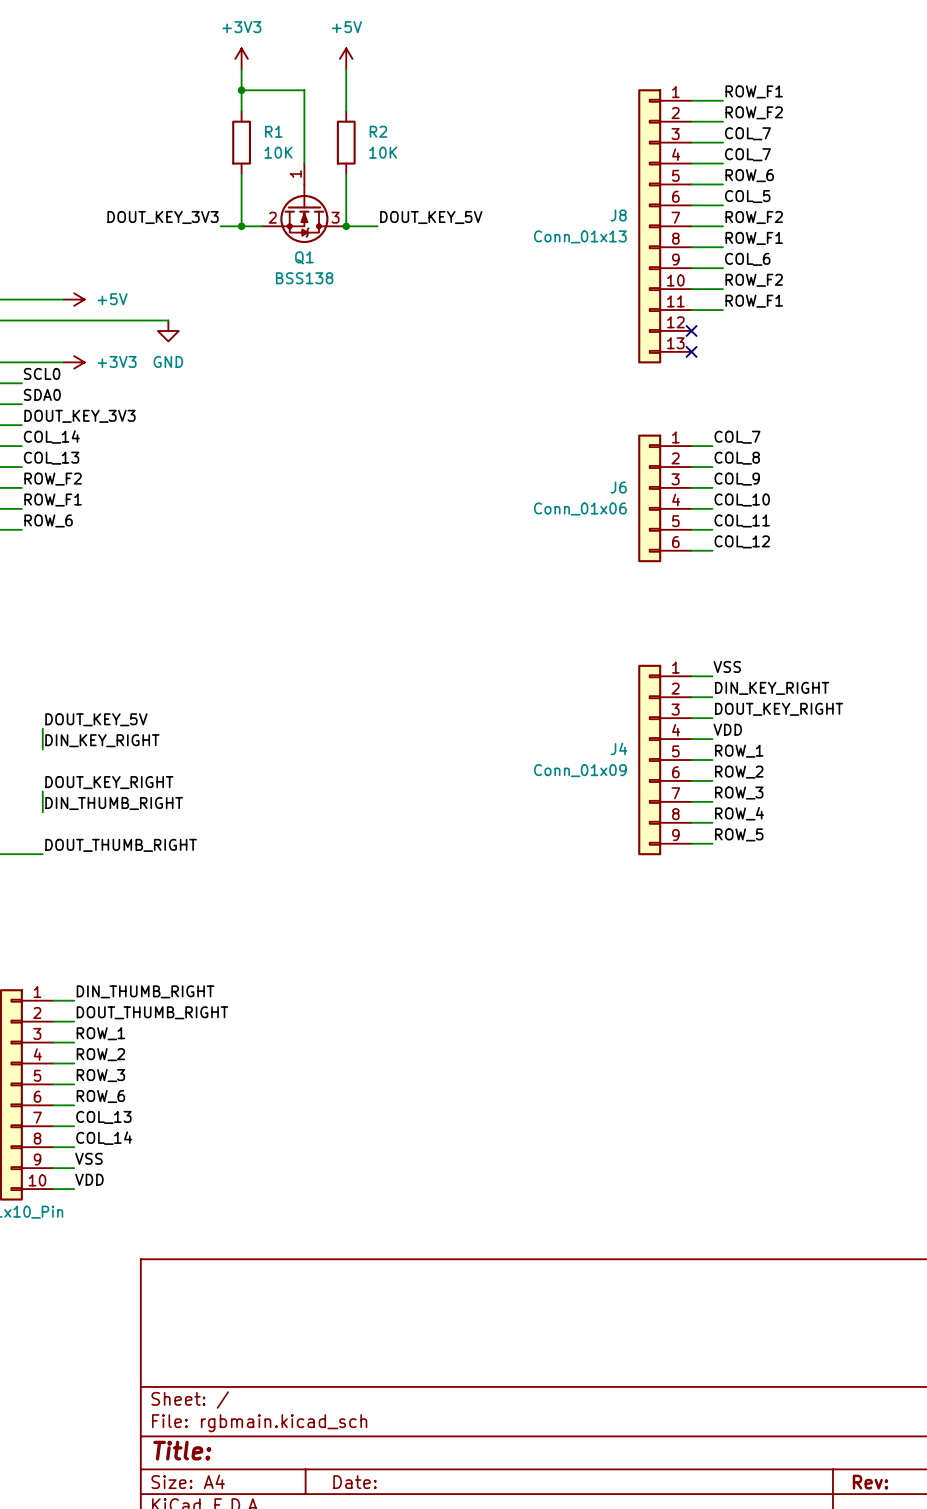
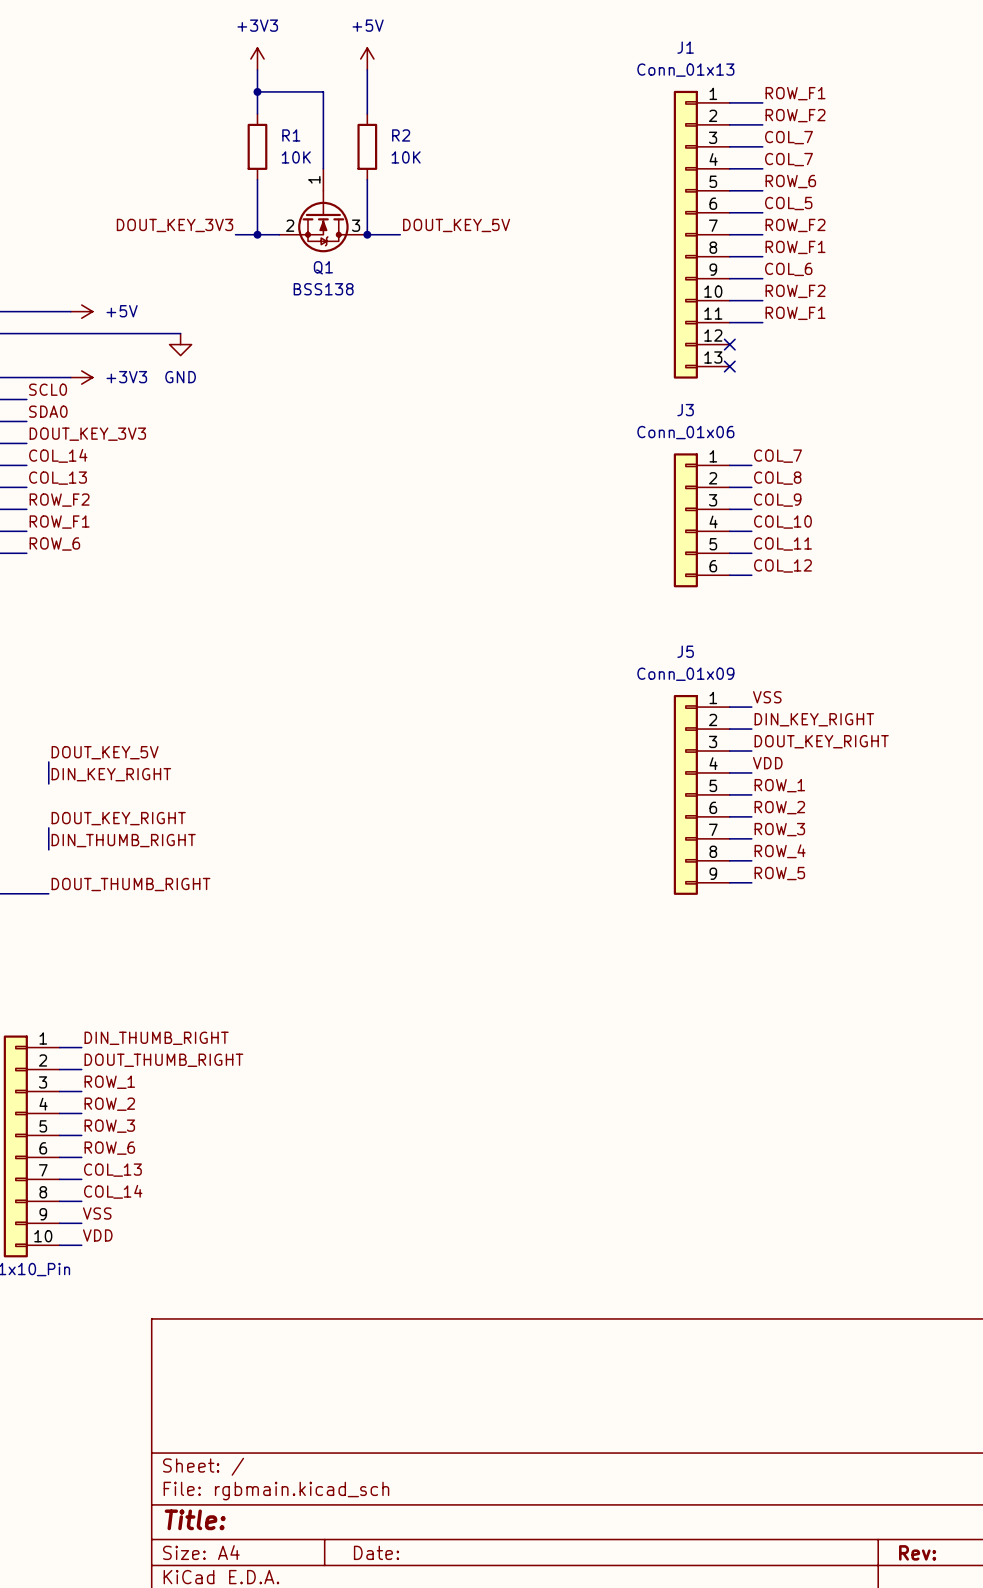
J8 name: J8 (618, 215) -> J1 (685, 47)
J8 value position: Conn_01x13 (580, 236) -> Conn_01x13 (685, 70)
J6 name: J6 (618, 487) -> J3 (685, 410)
J6 value position: Conn_01x06 (580, 508) -> Conn_01x06 (685, 432)
J4 name: J4 (618, 748) -> J5 (685, 651)
J4 value position: Conn_01x09 (580, 770) -> Conn_01x09 (685, 674)

